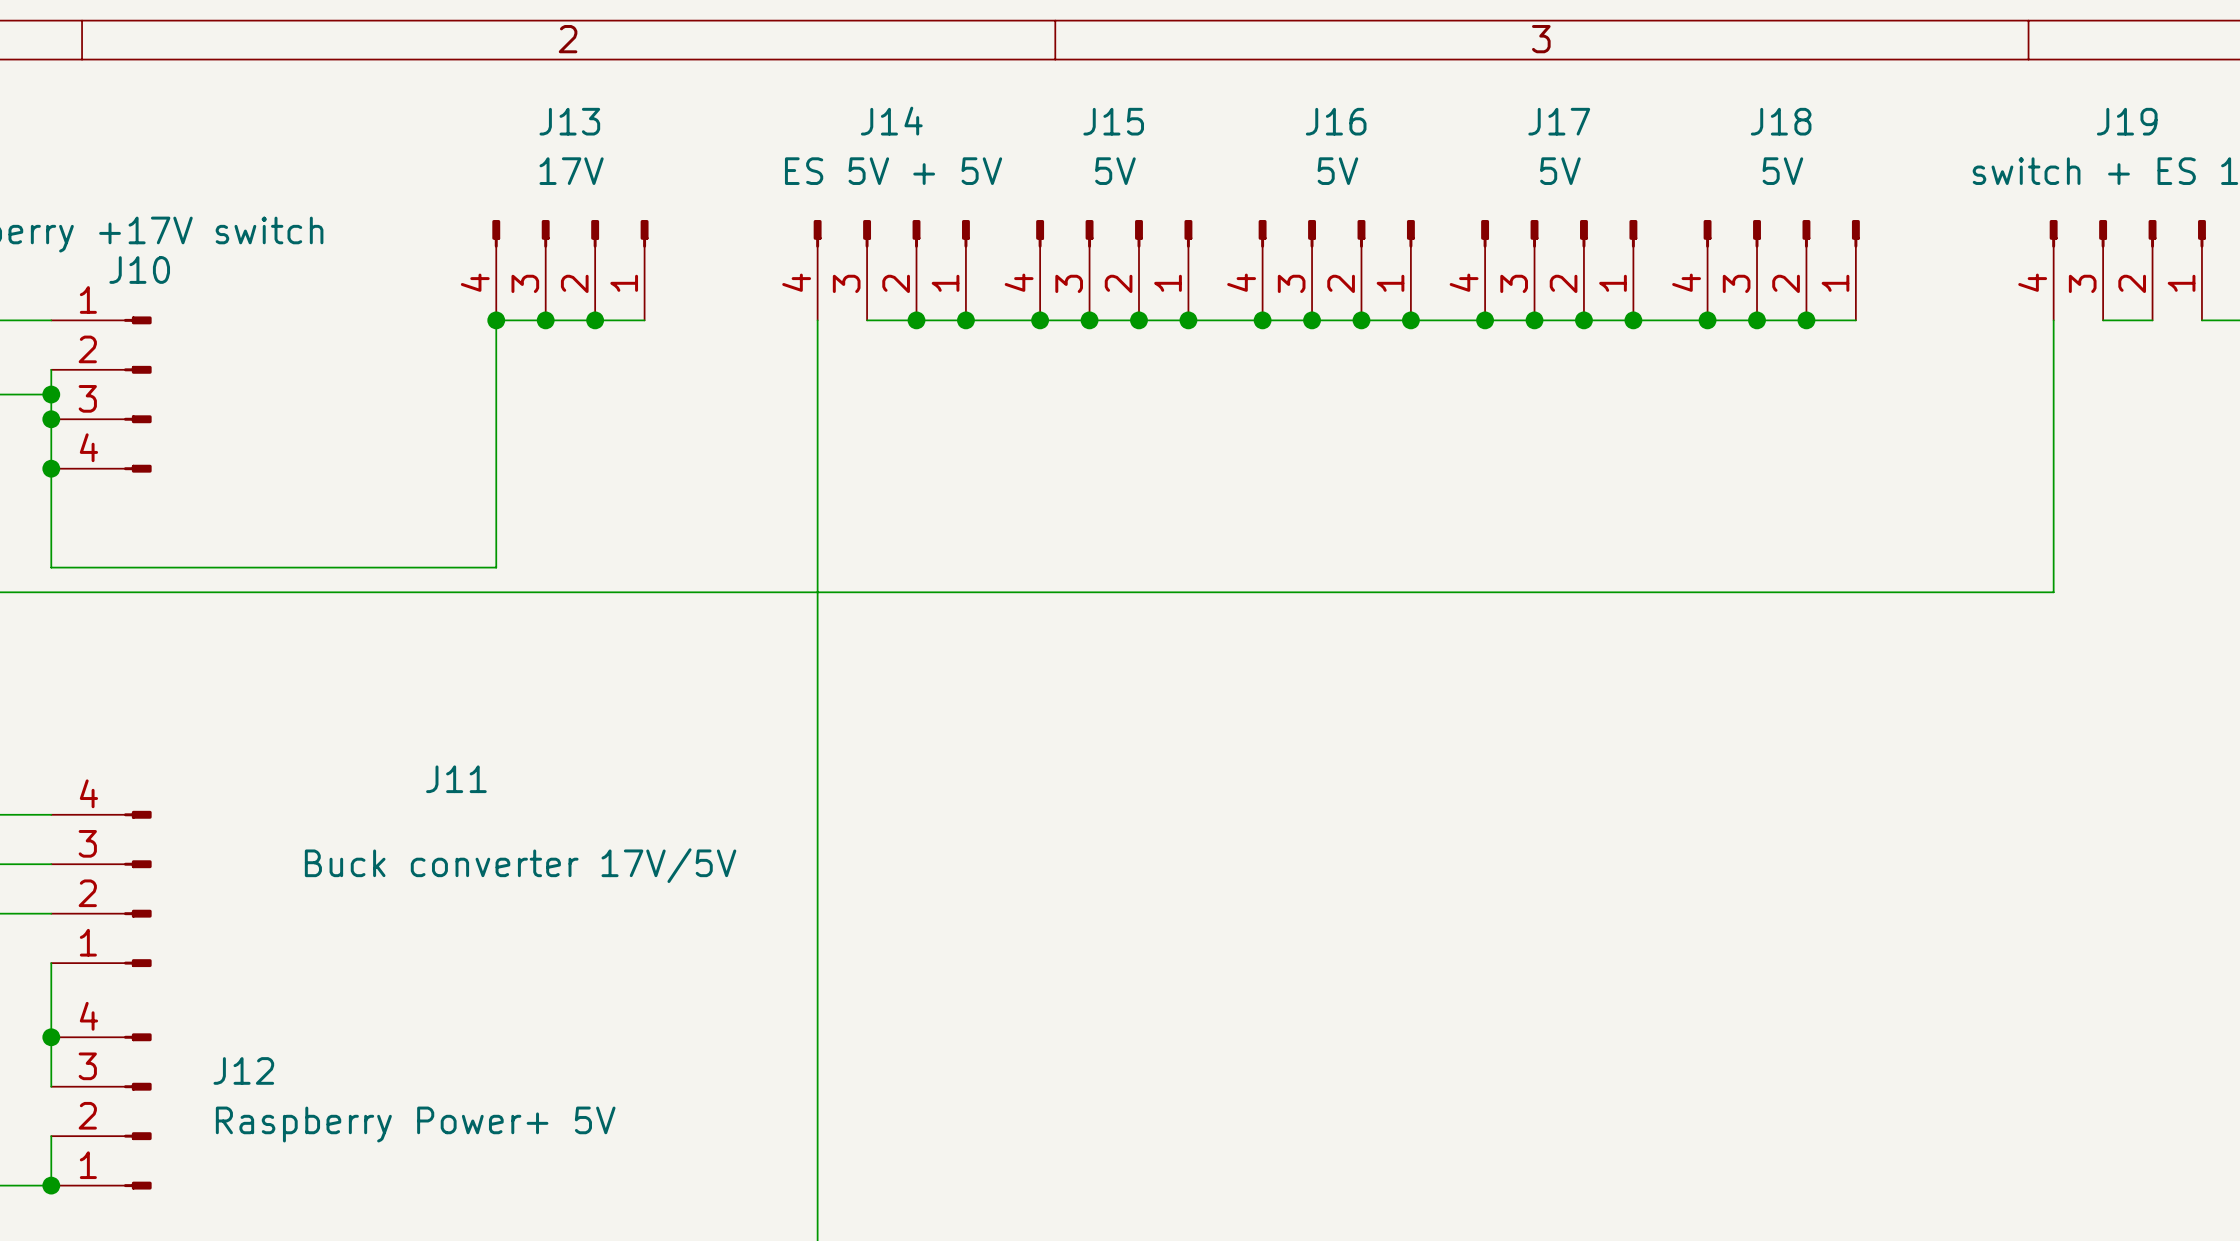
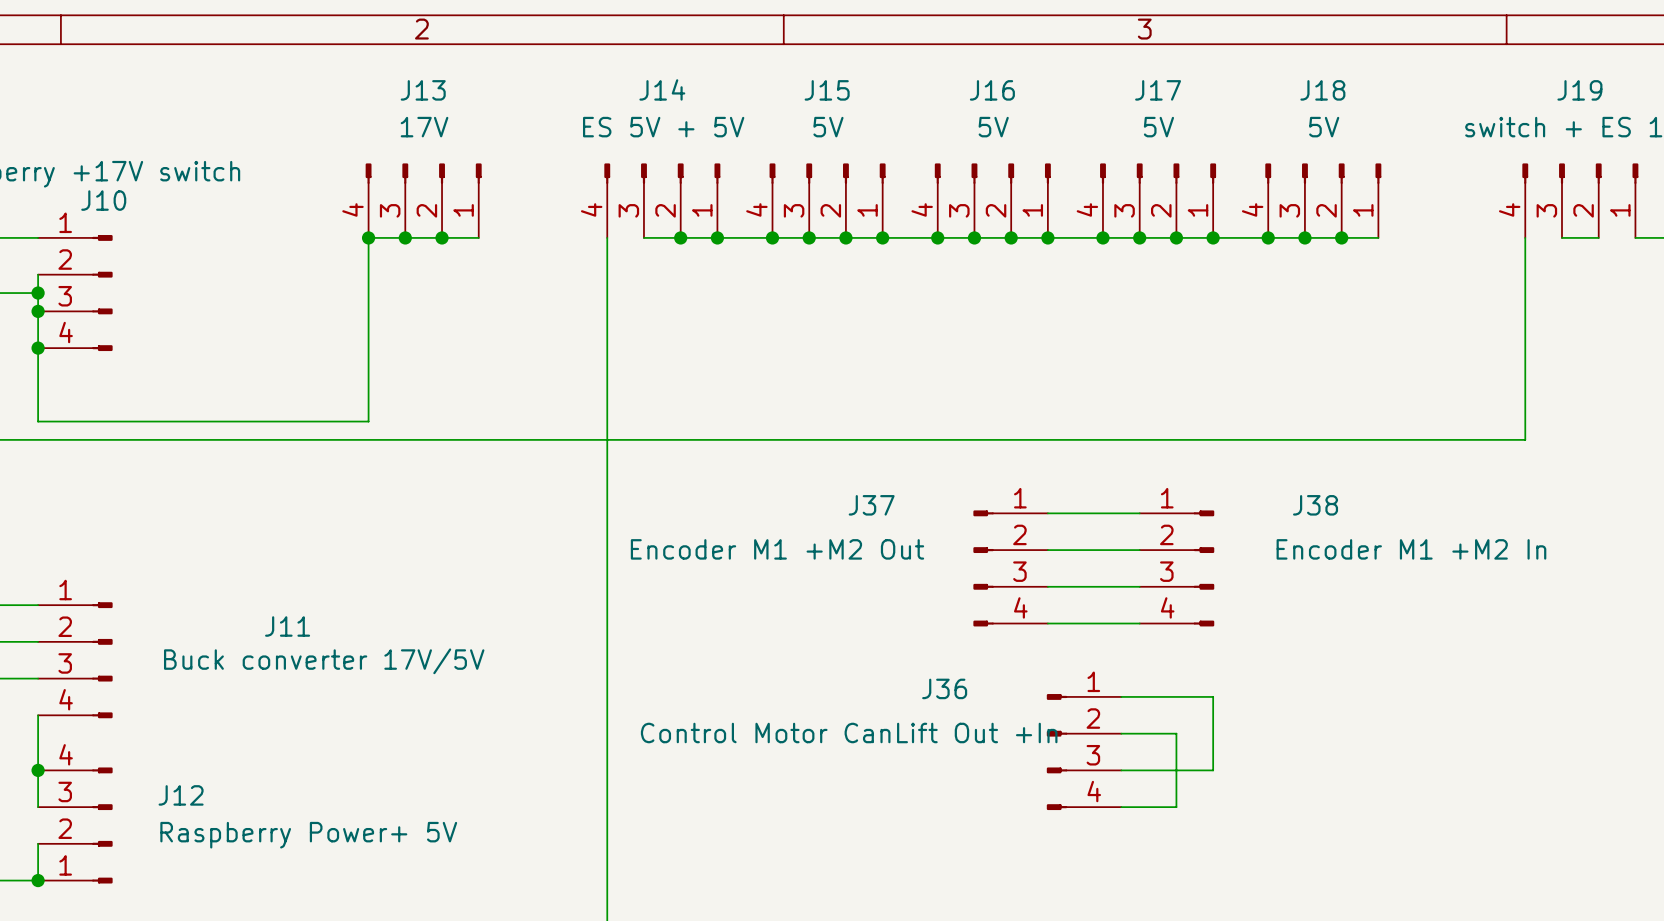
wire: none -> (1047, 513) (1139, 513)
wire: none -> (1047, 550) (1139, 550)
J37: none -> Encoder M1 +M2 Out (1010, 568)
J38: none -> Encoder M1 +M2 In (1176, 568)
J11 name position: J11 (456, 779) -> J11 (287, 626)
wire: none -> (1047, 586) (1139, 586)
wire: none -> (1047, 623) (1139, 623)
J11 value position: Buck converter 17V/5V (520, 865) -> Buck converter 17V/5V (324, 661)
J11 flip: as is (137, 888) -> up-down (102, 660)
wire: none -> (1121, 696) (1213, 696) (1213, 770) (1121, 770)
wire: none -> (1121, 733) (1176, 733) (1176, 807) (1121, 807)
J36: none -> Control Motor CanLift Out +In (1084, 752)

